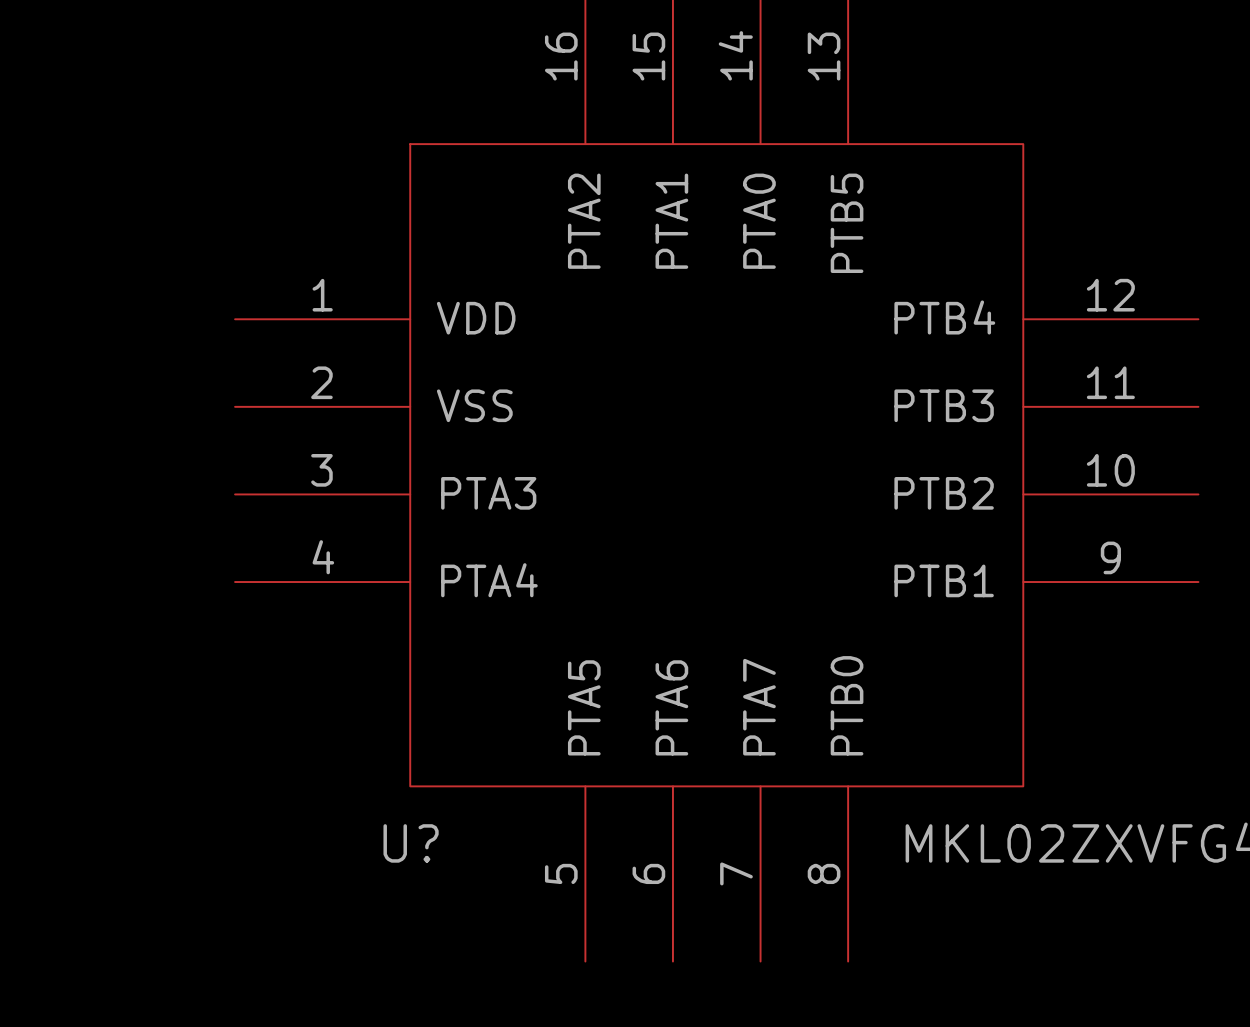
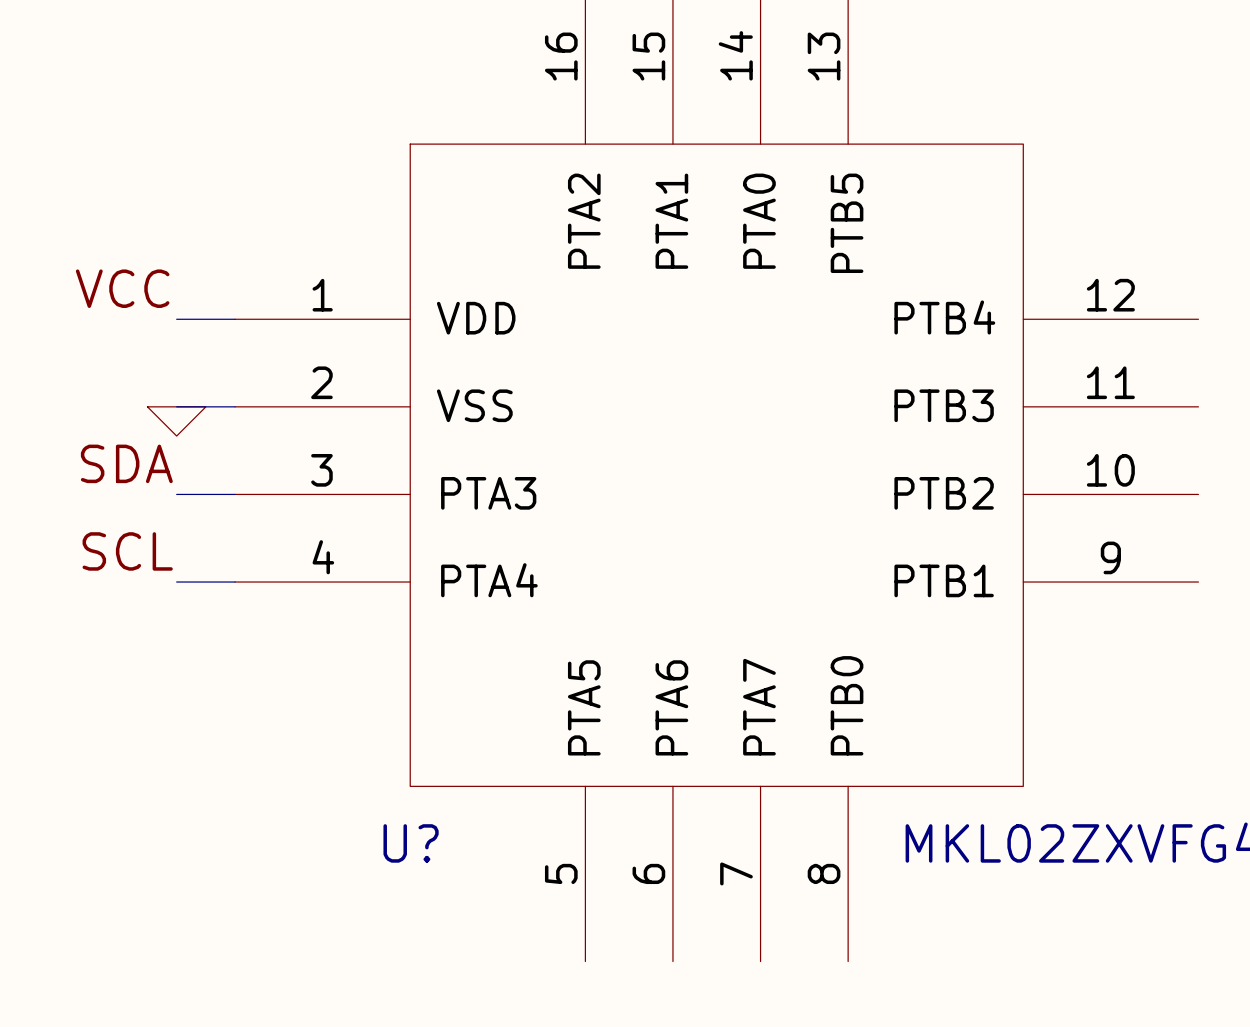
label: none -> VCC (122, 288)
wire: none -> (176, 319) (235, 319)
wire: none -> (176, 406) (235, 406)
power symbol: none -> (176, 421)
label: none -> SDA (126, 463)
wire: none -> (176, 494) (235, 494)
label: none -> SCL (127, 551)
wire: none -> (176, 582) (235, 582)

